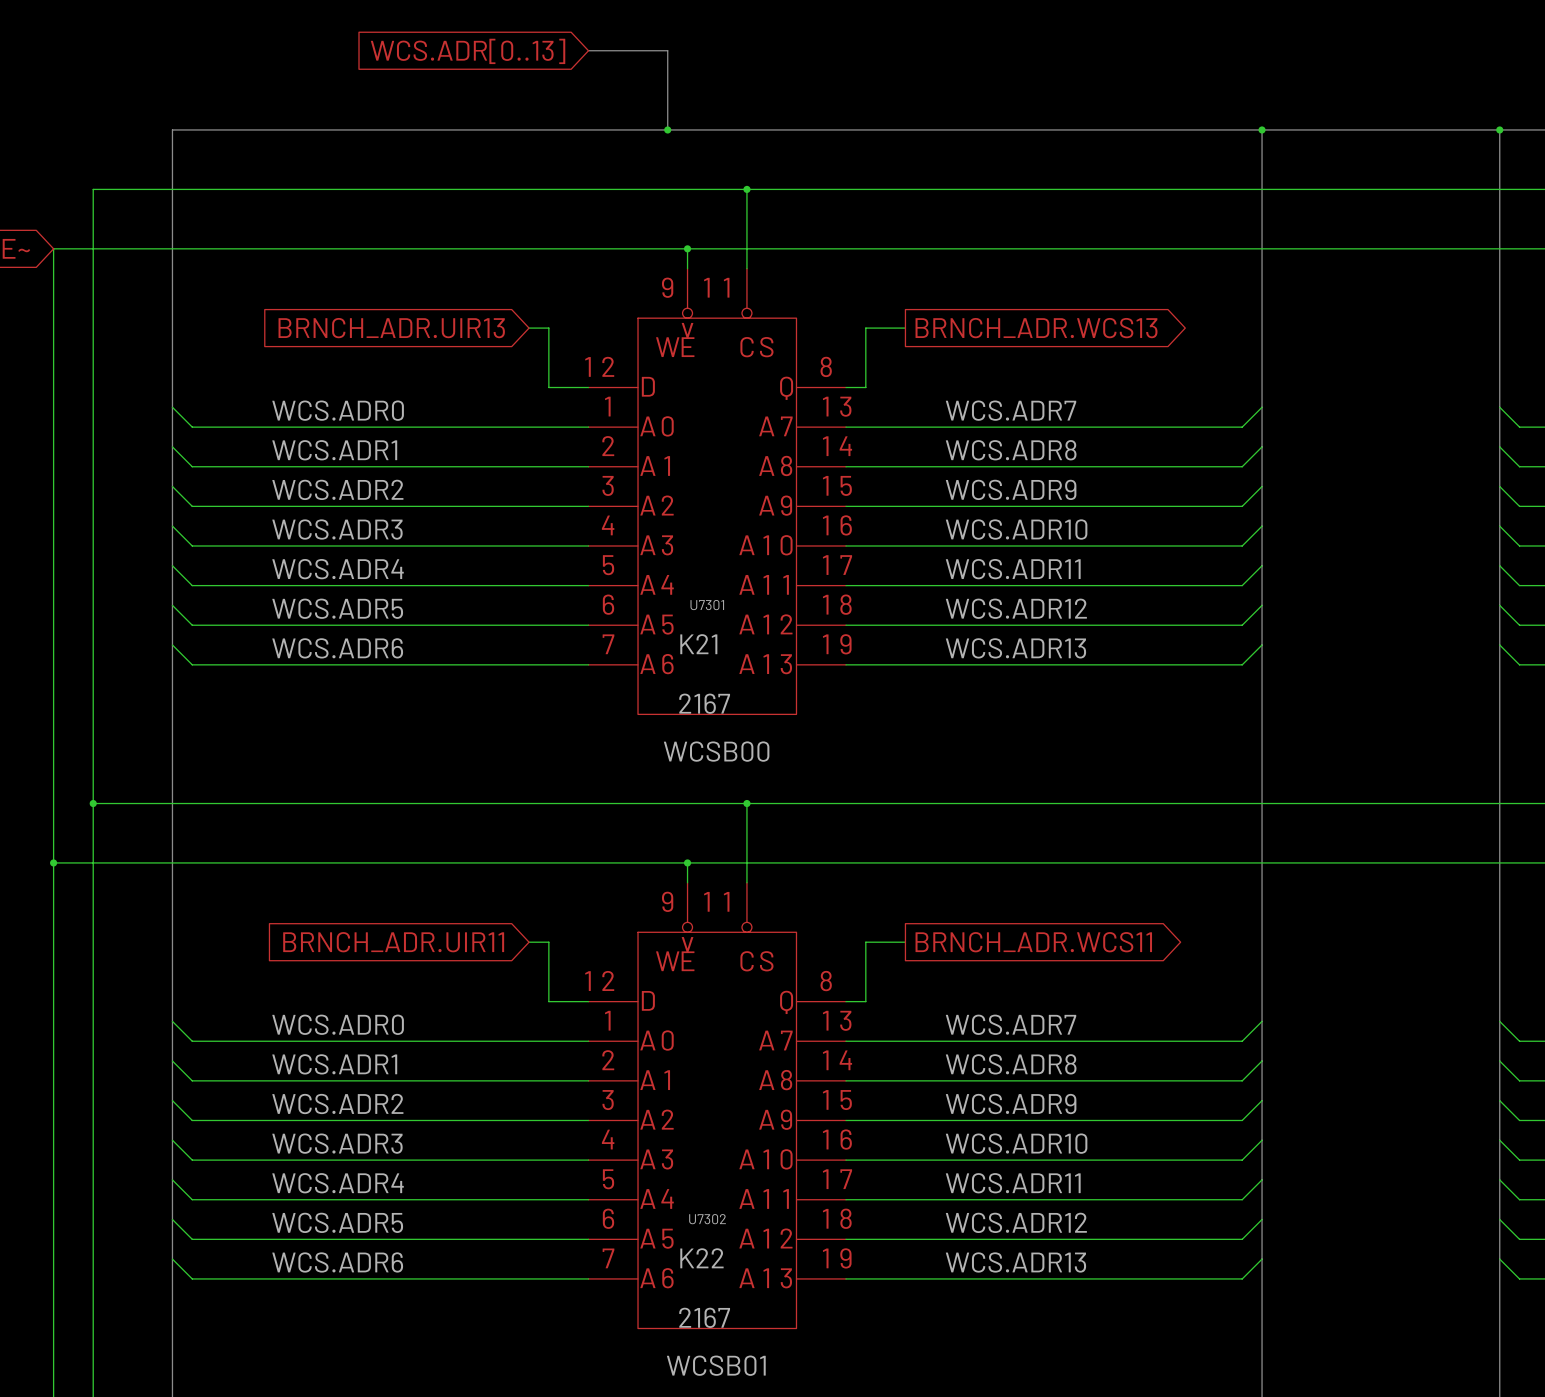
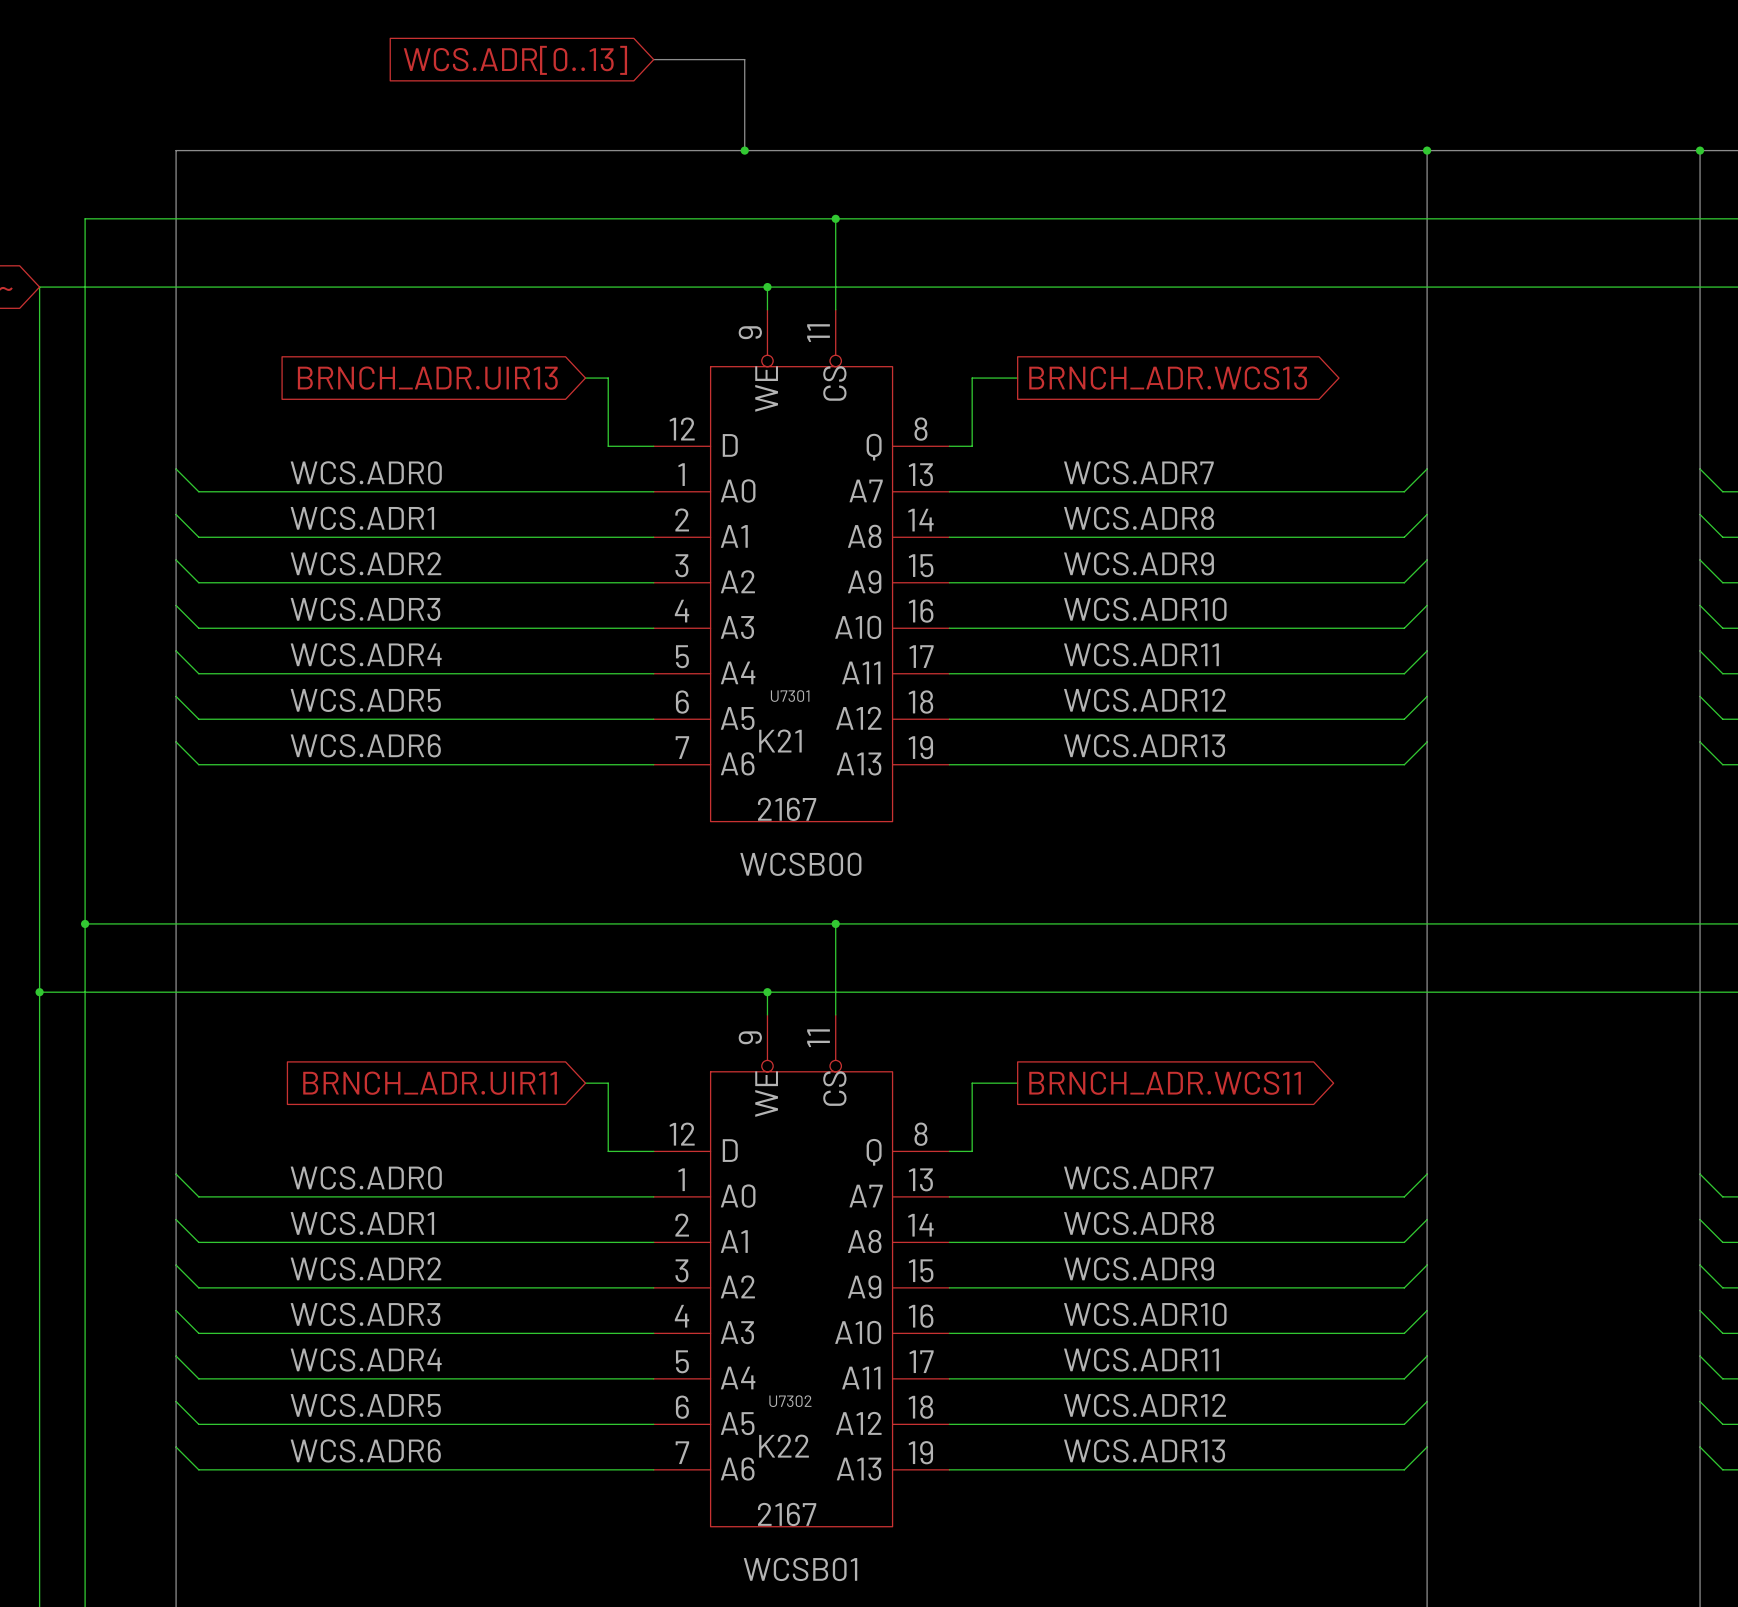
U7301 symbol: [588, 268, 847, 715] -> [653, 309, 950, 822]
U7302 symbol: [588, 882, 847, 1329] -> [653, 1014, 950, 1527]

